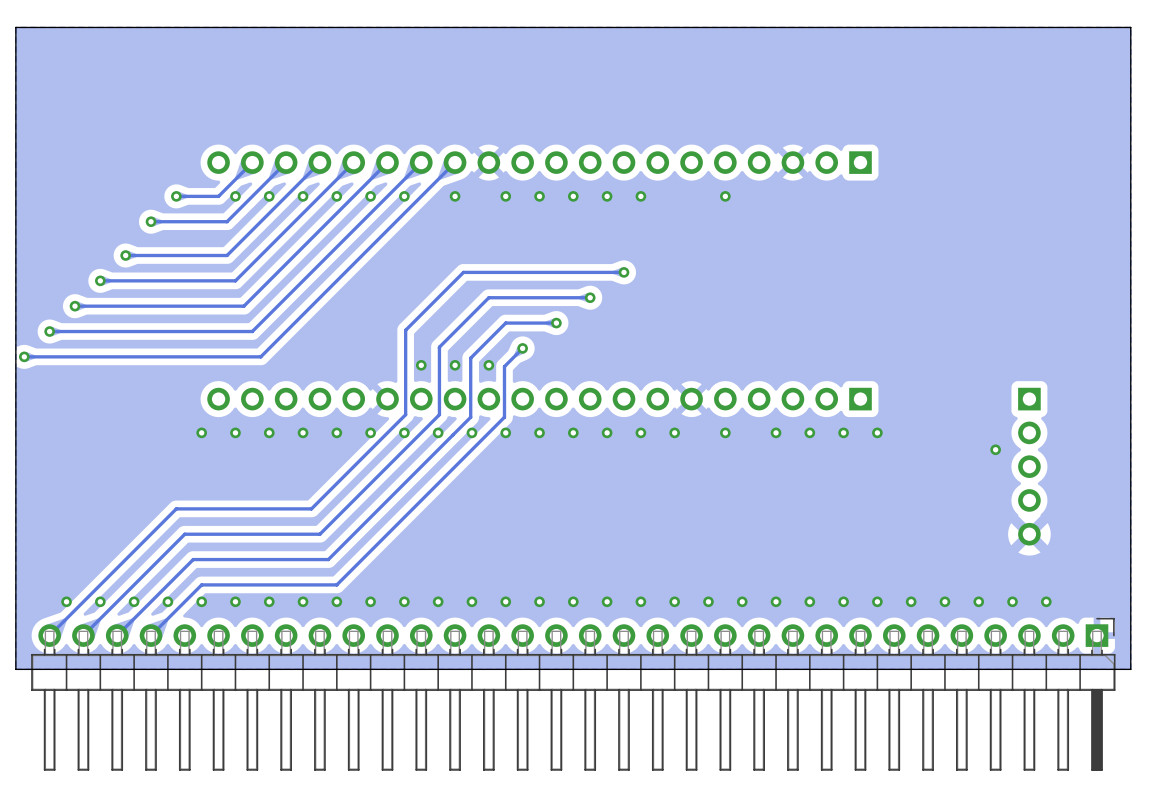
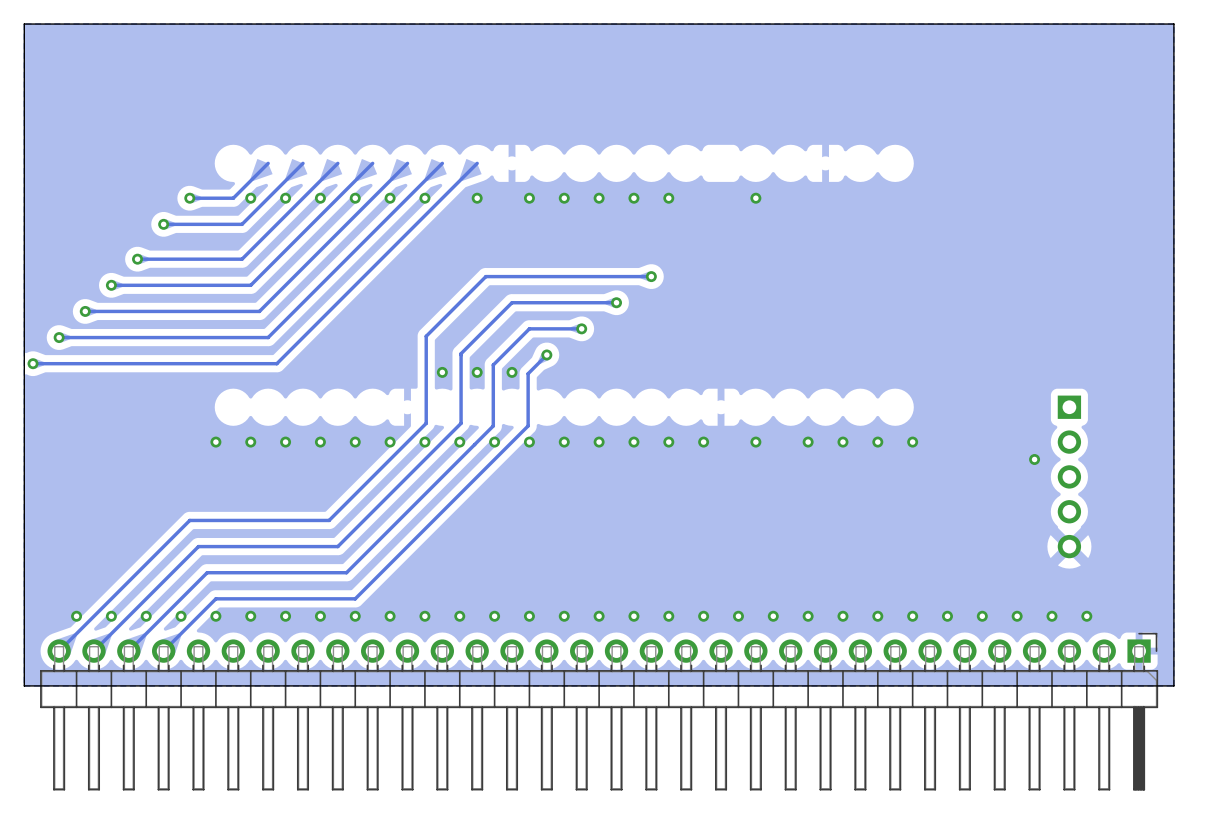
part: (539, 162) -> none
part: (539, 399) -> none

